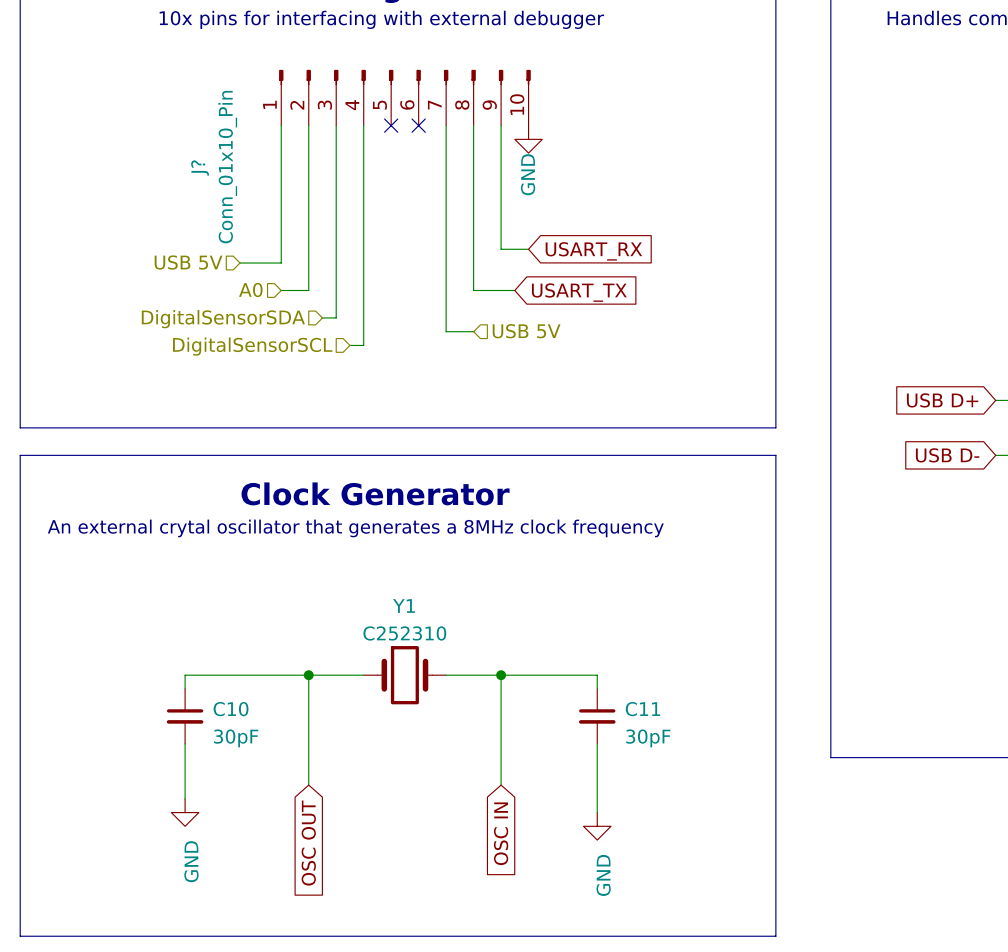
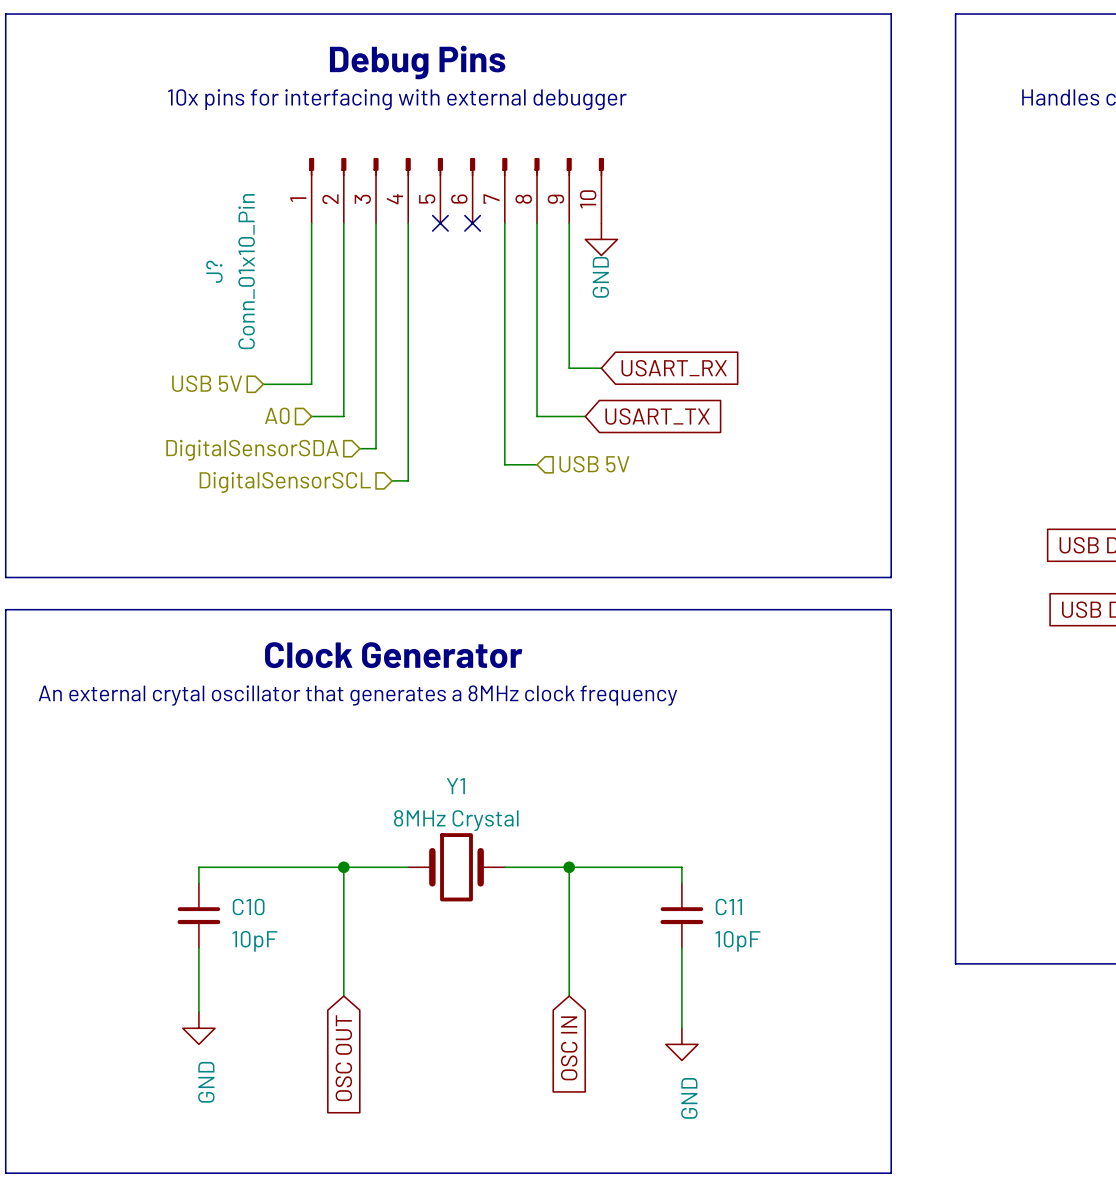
Y1 value: C252310 (404, 633) -> 8MHz Crystal (456, 820)
C10 value: 30pF (236, 738) -> 10pF (254, 941)
C11 value: 30pF (648, 738) -> 10pF (737, 941)

